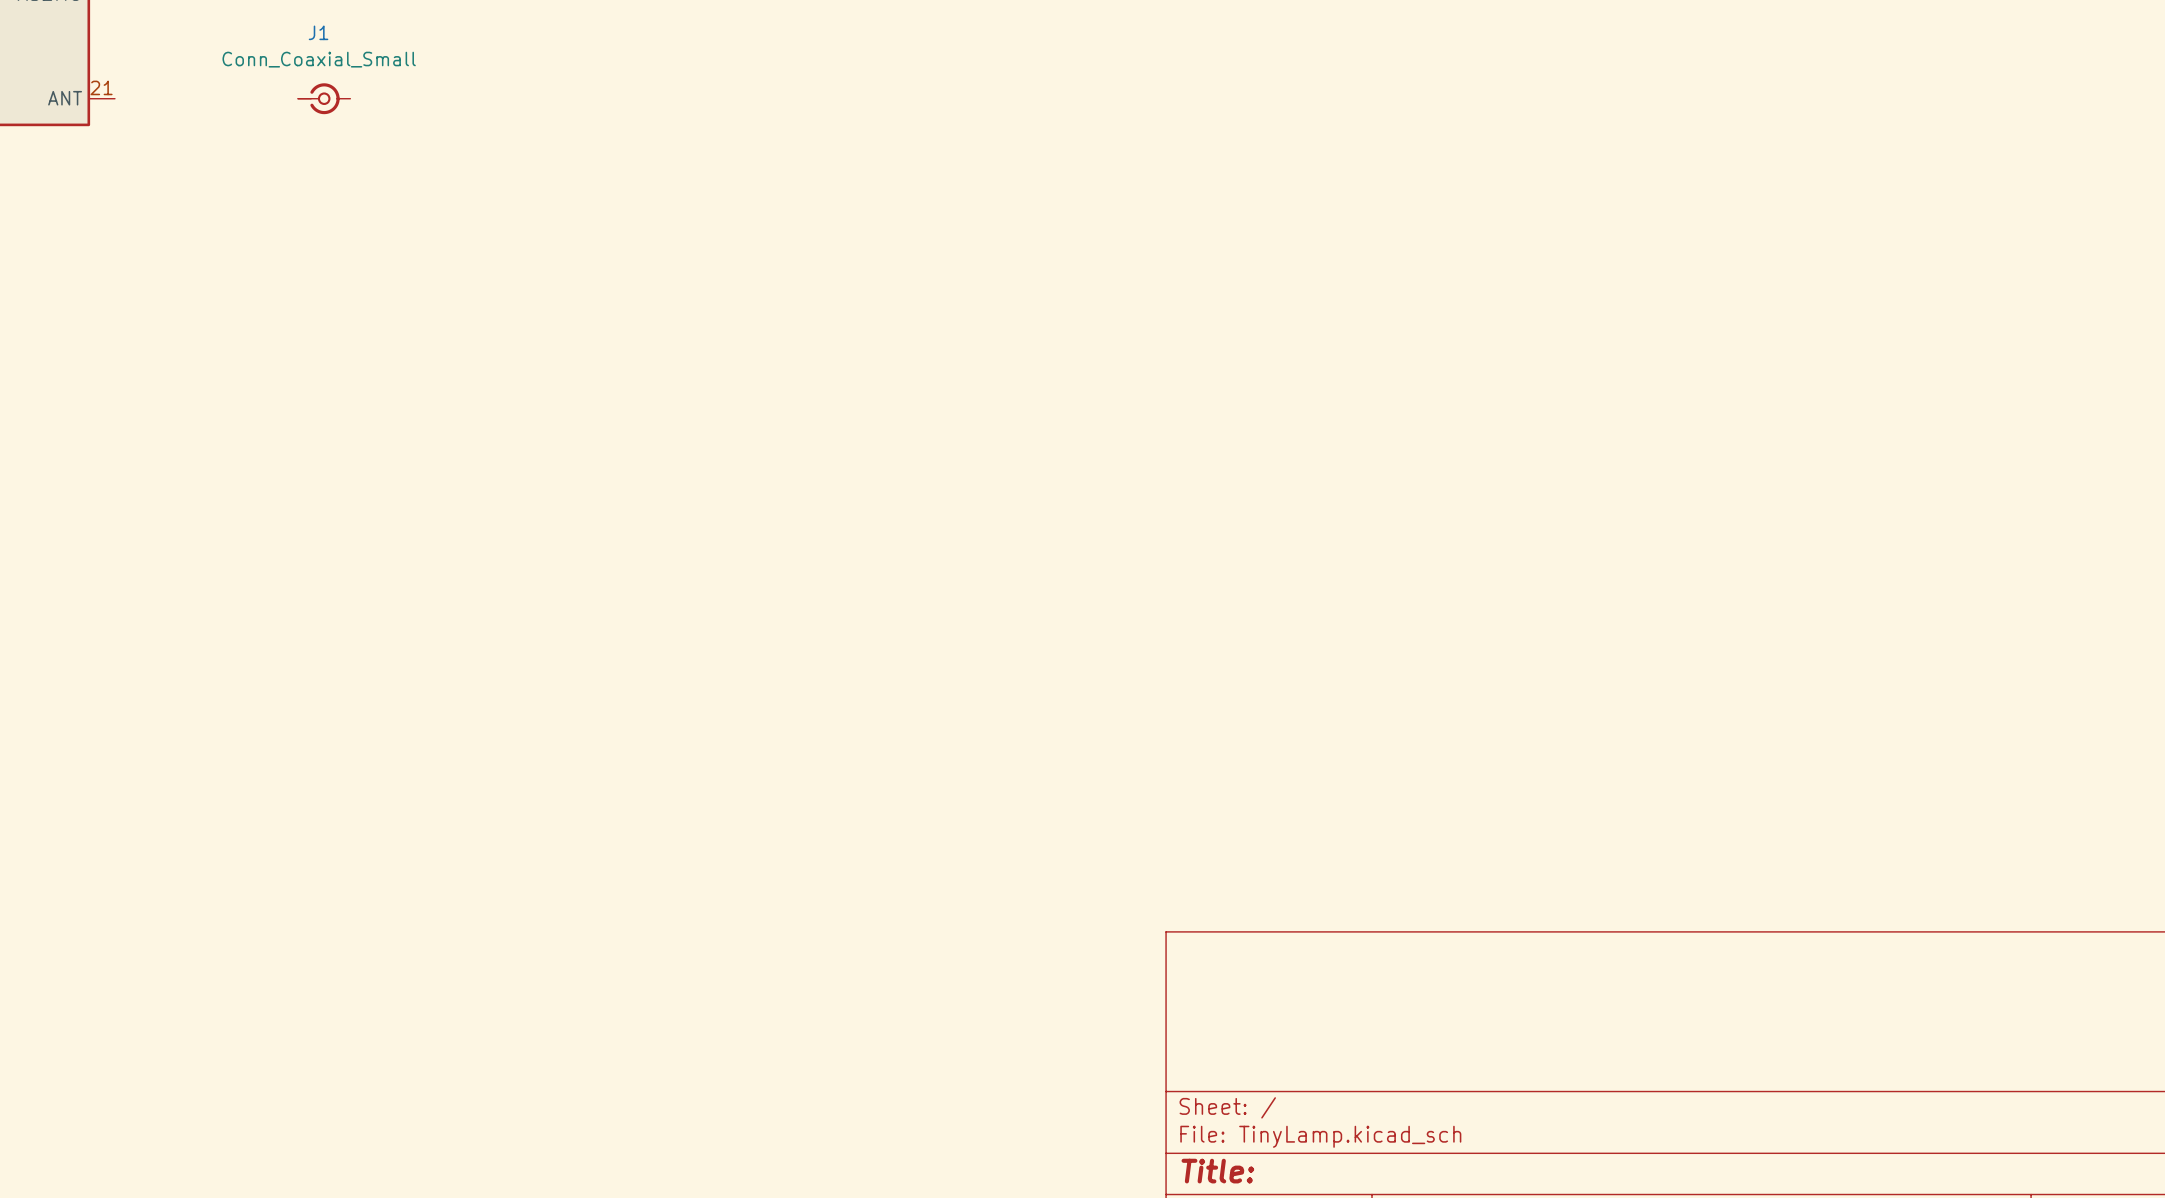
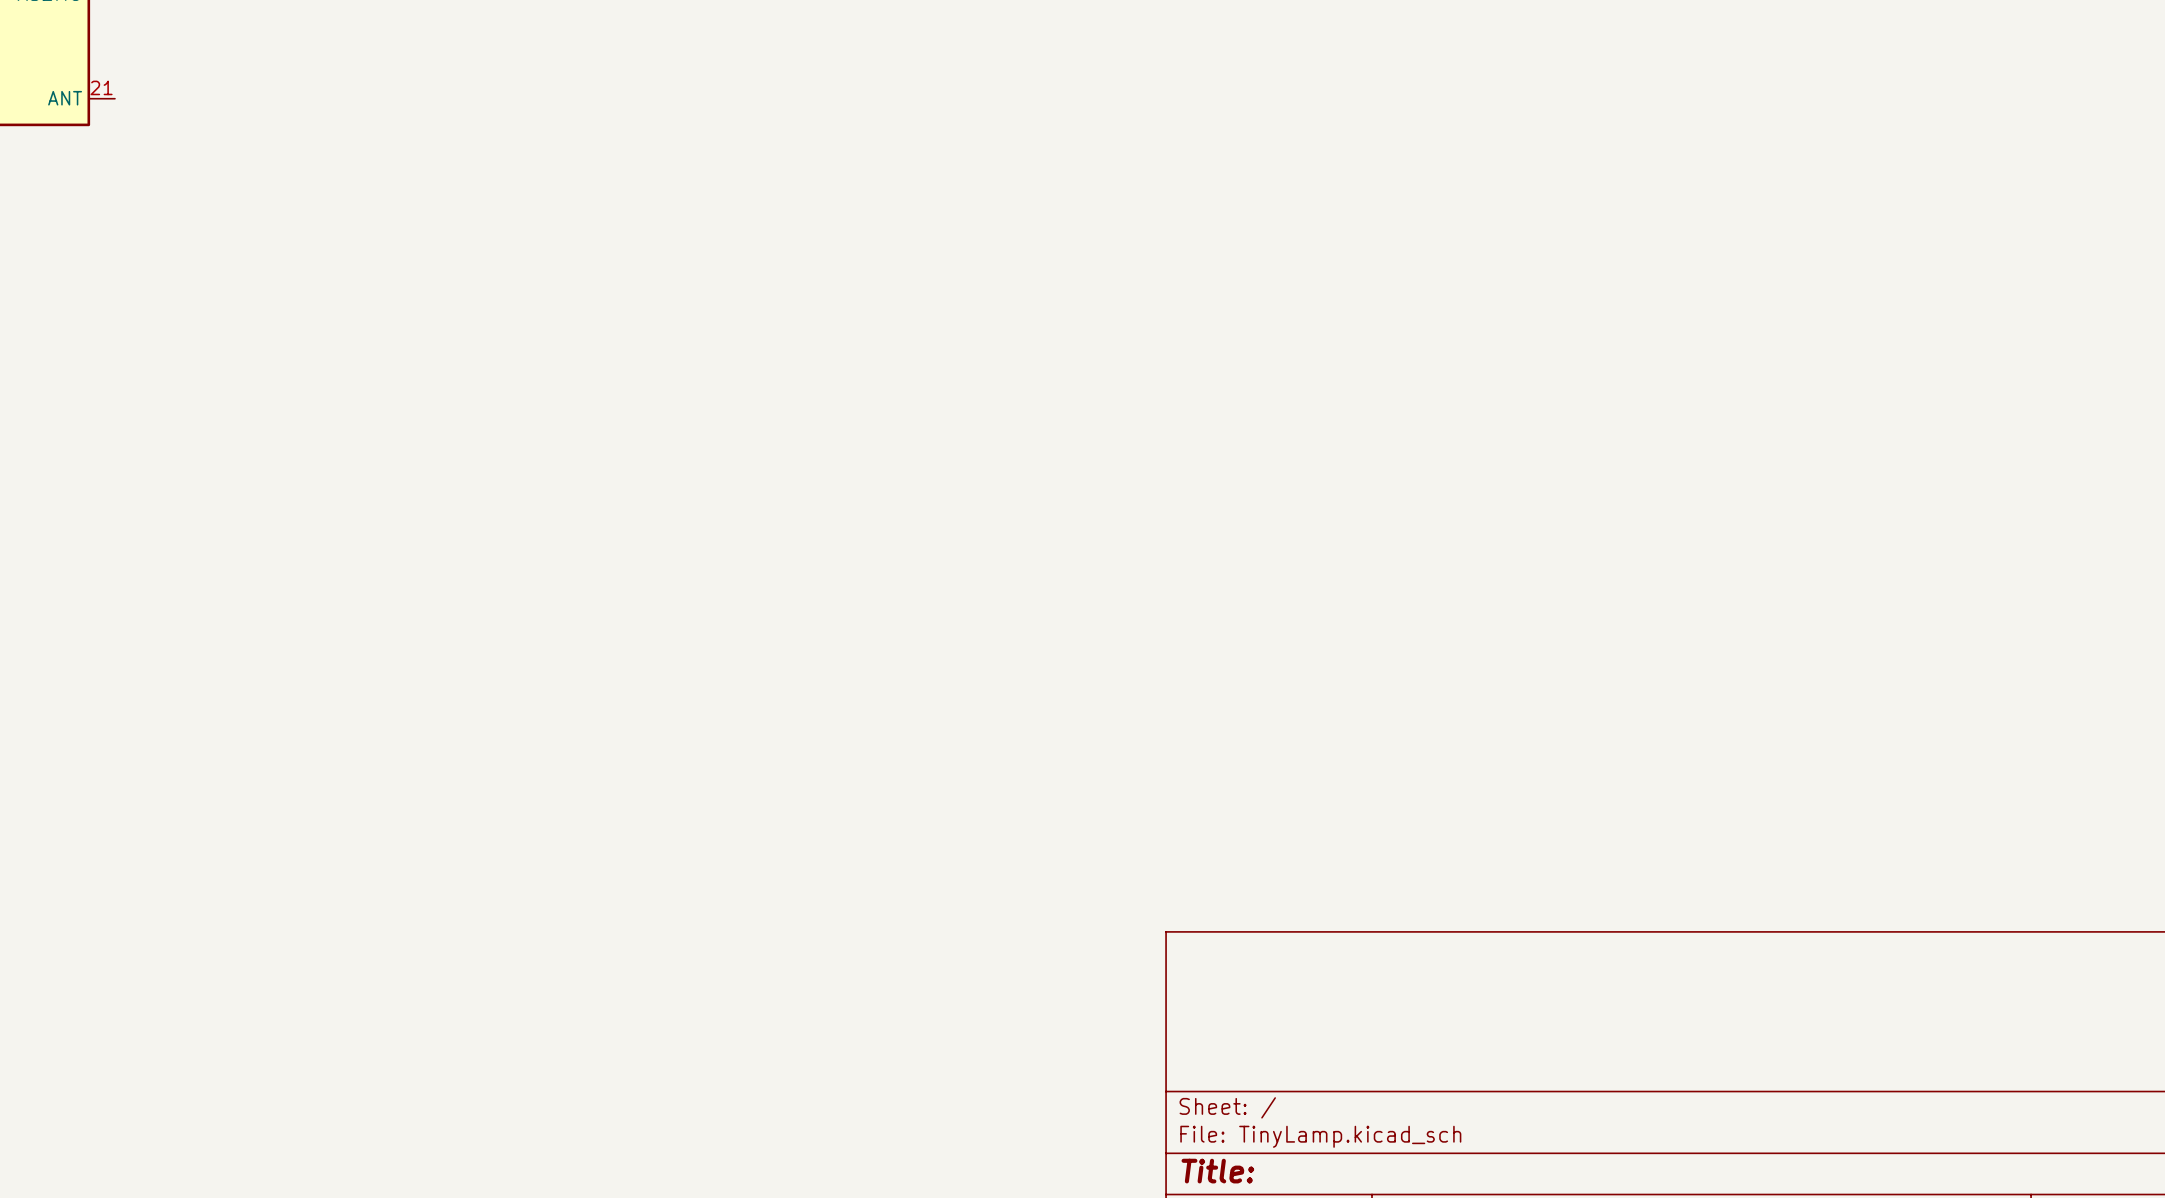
J1: Conn_Coaxial_Small (324, 98) -> none

